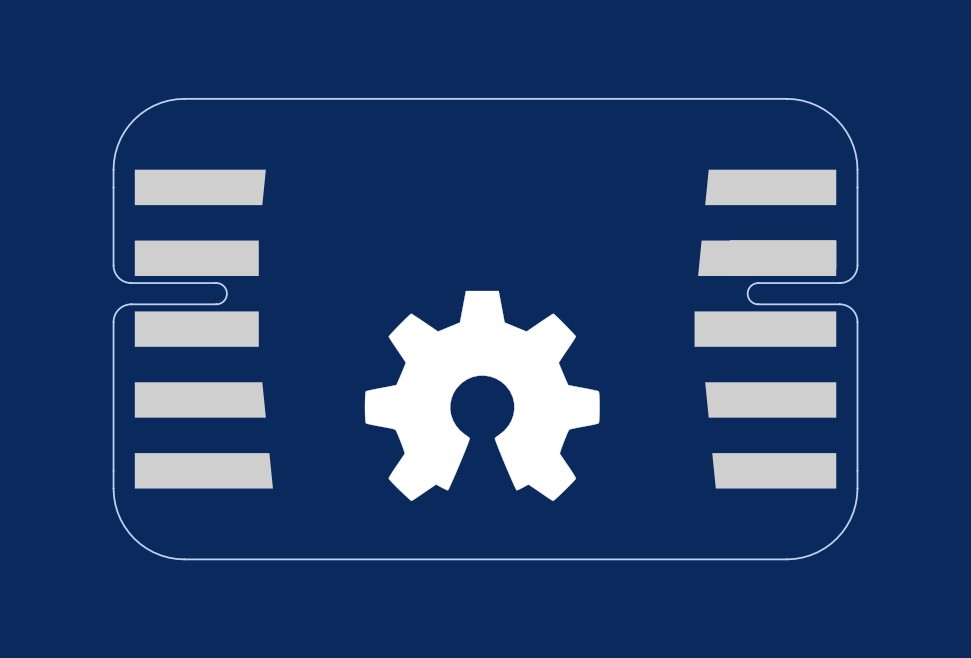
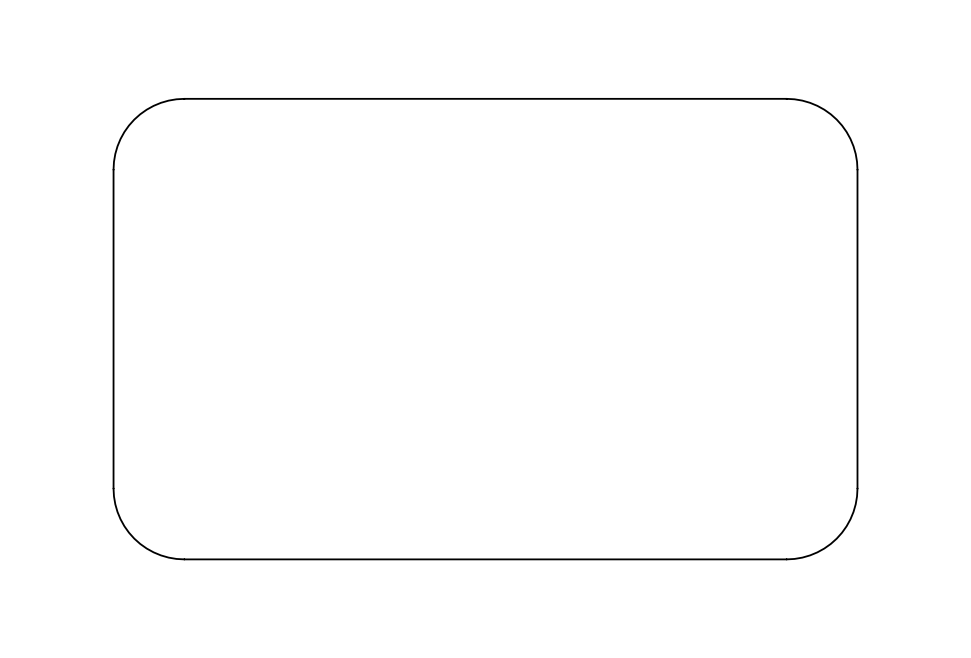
board edge: none -> (113, 187) (113, 470)
board edge: none -> (857, 187) (857, 470)
drawing: [364, 290, 600, 502] -> none
part: (192, 329) -> none
part: (776, 329) -> none

